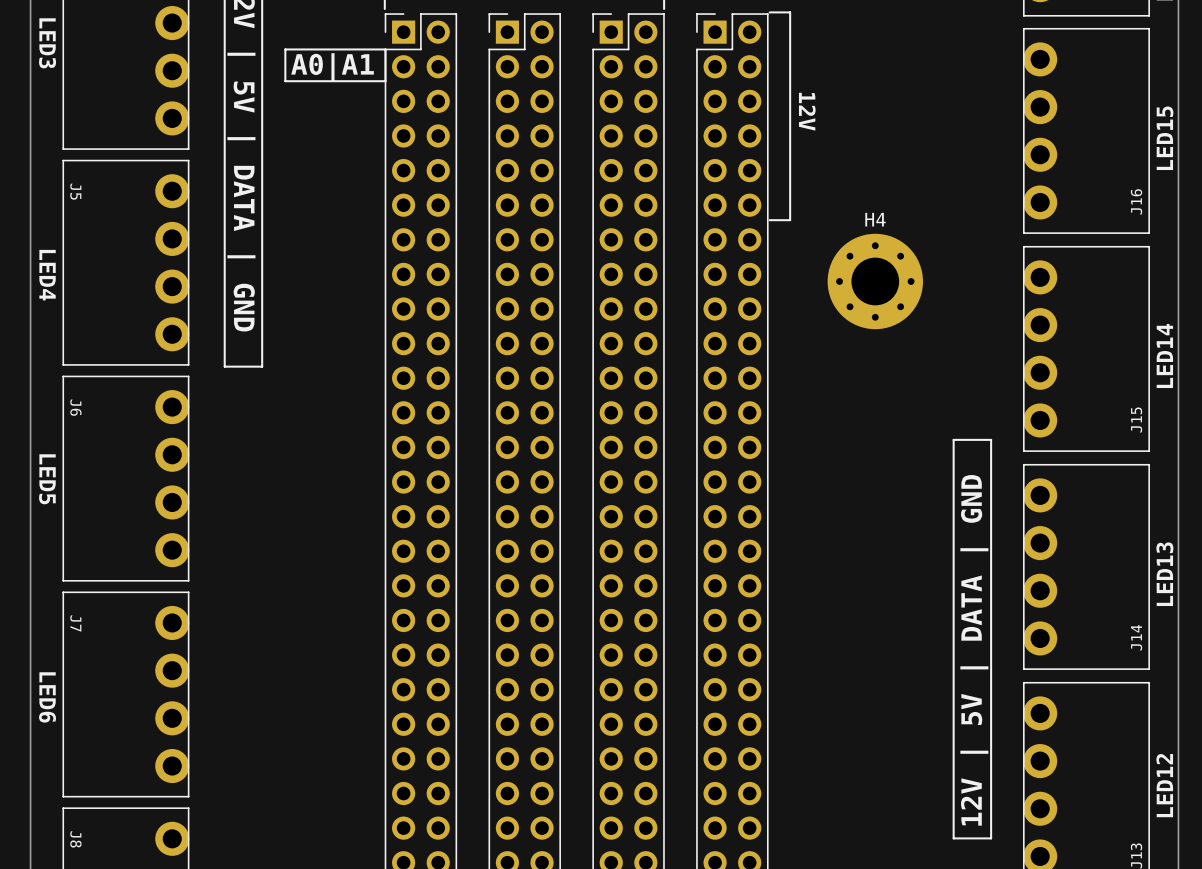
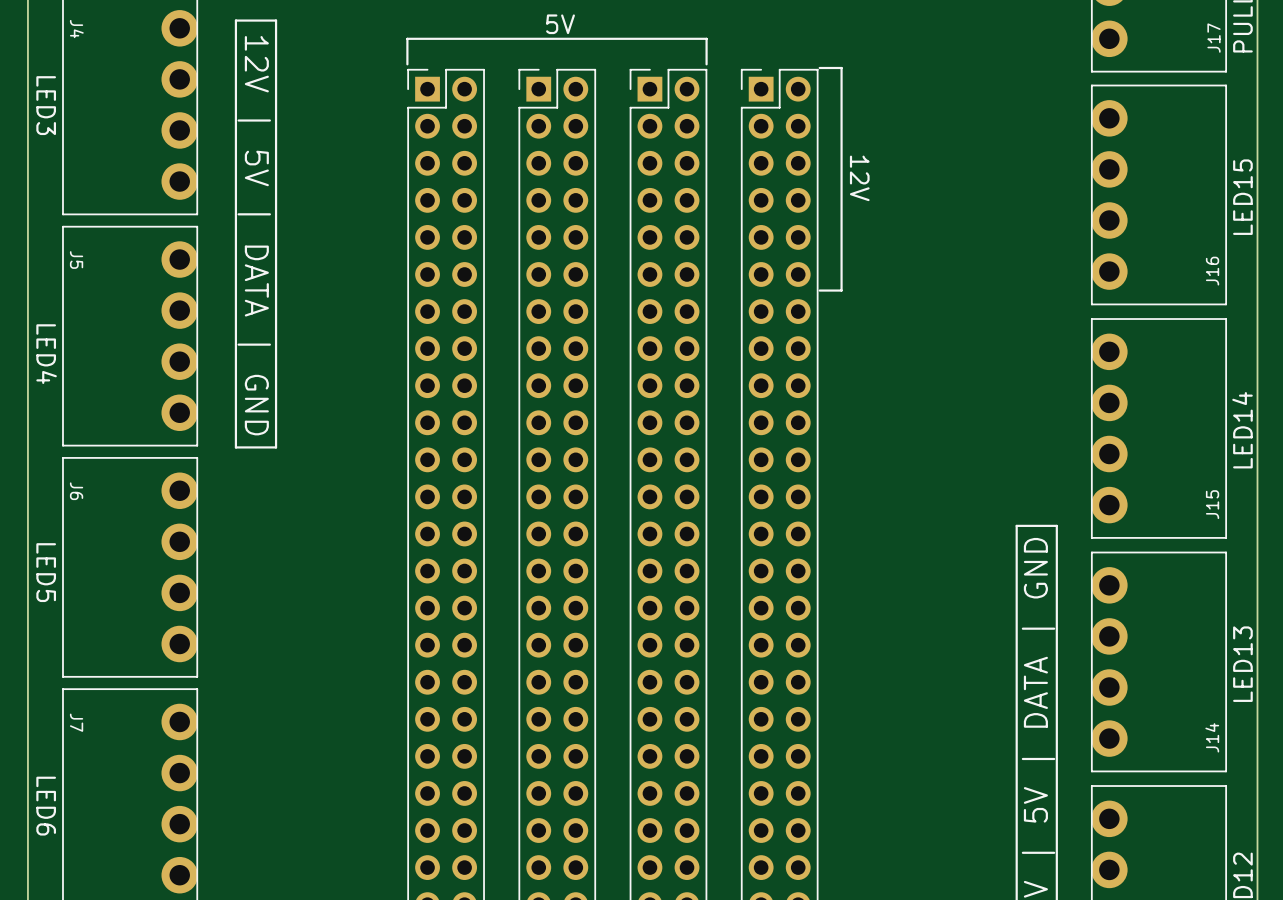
line: (285, 49) (385, 49) (385, 81) (285, 81) (285, 49) -> none
text: A0|A1 (332, 67) -> none
H4: (875, 281) -> none

